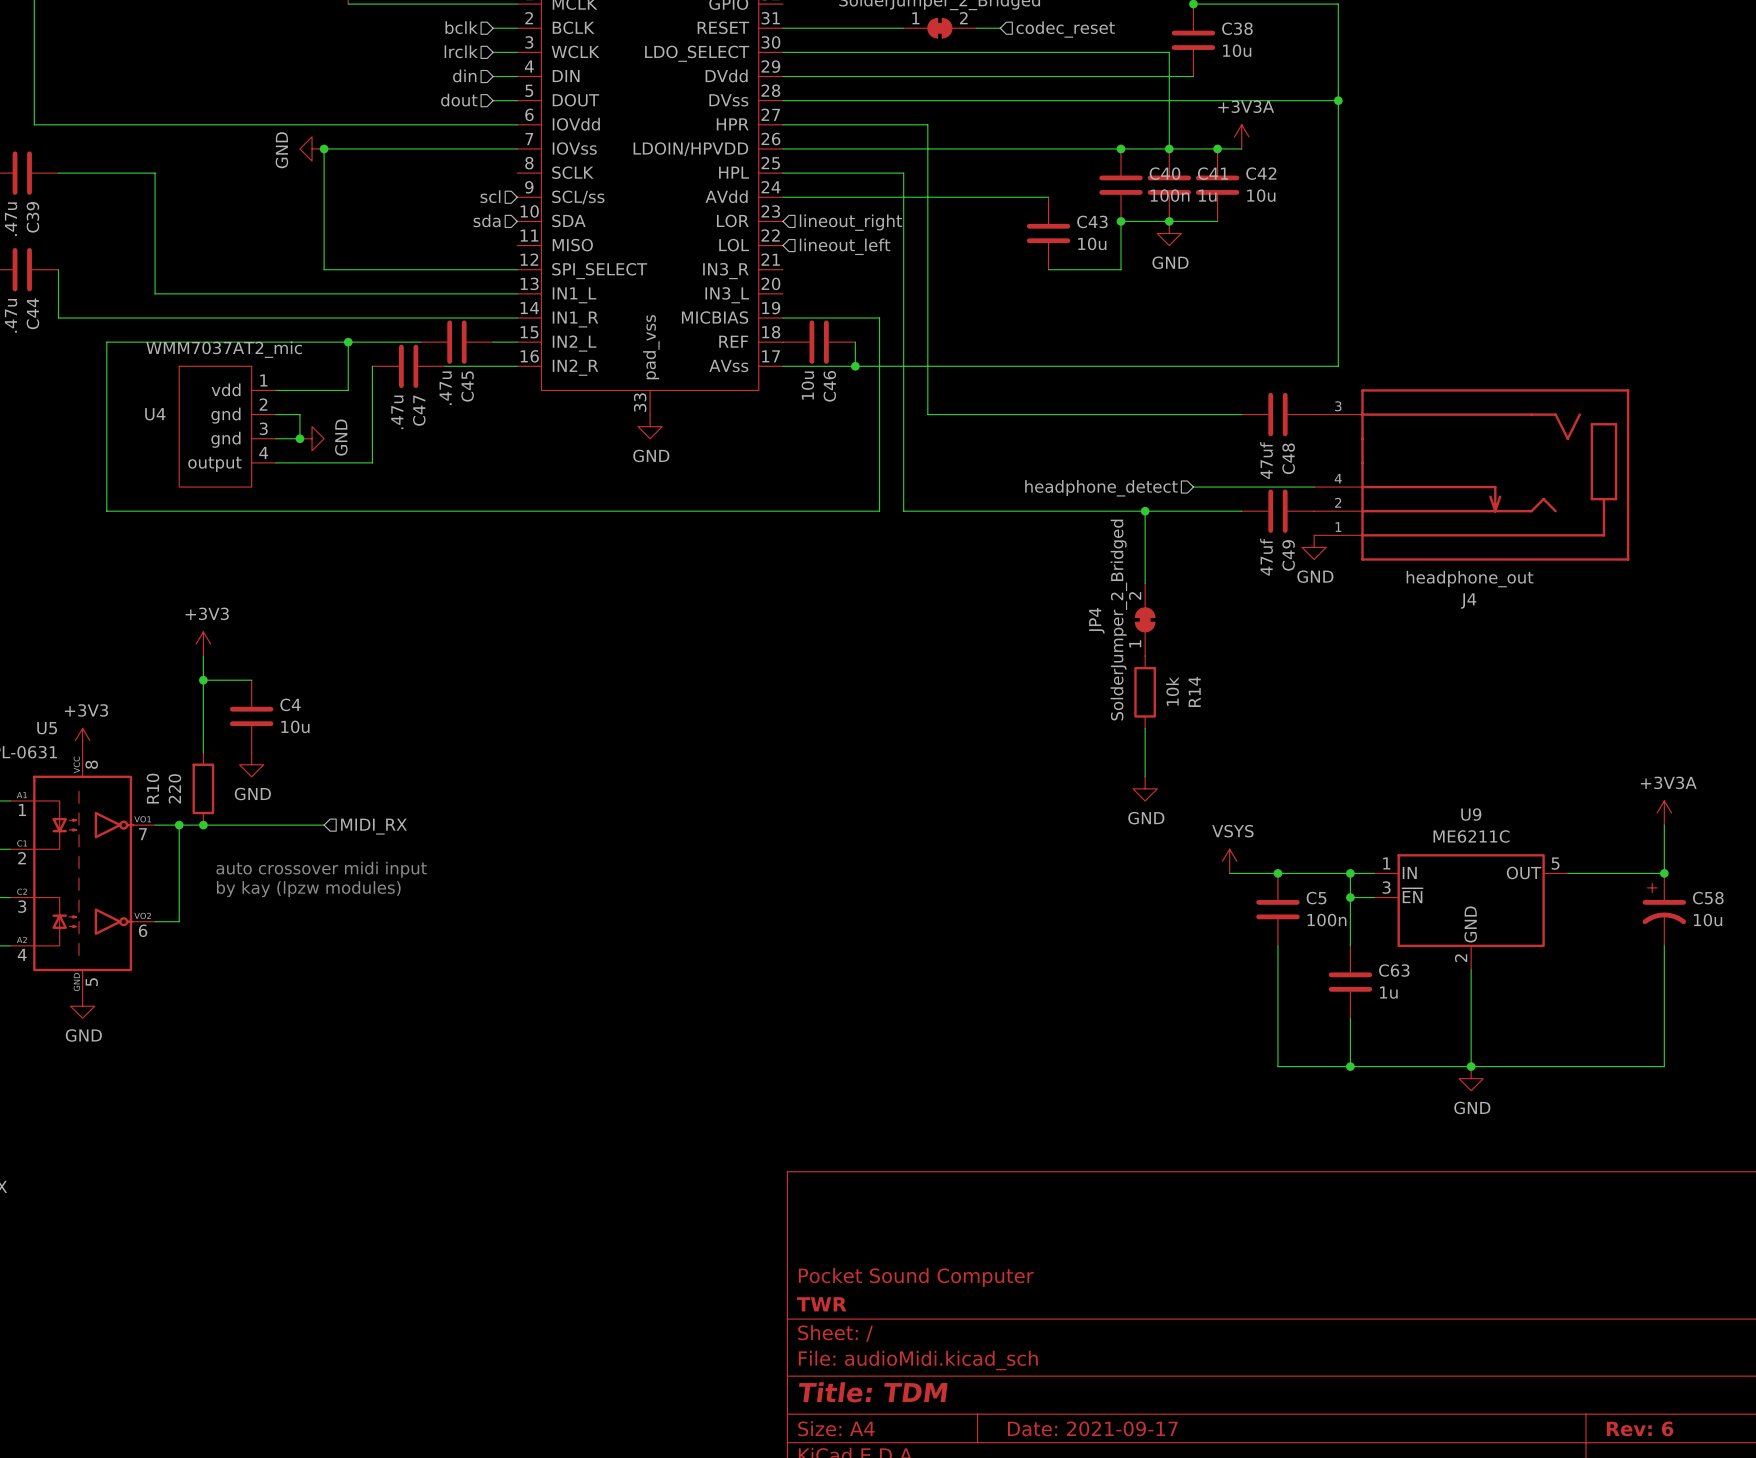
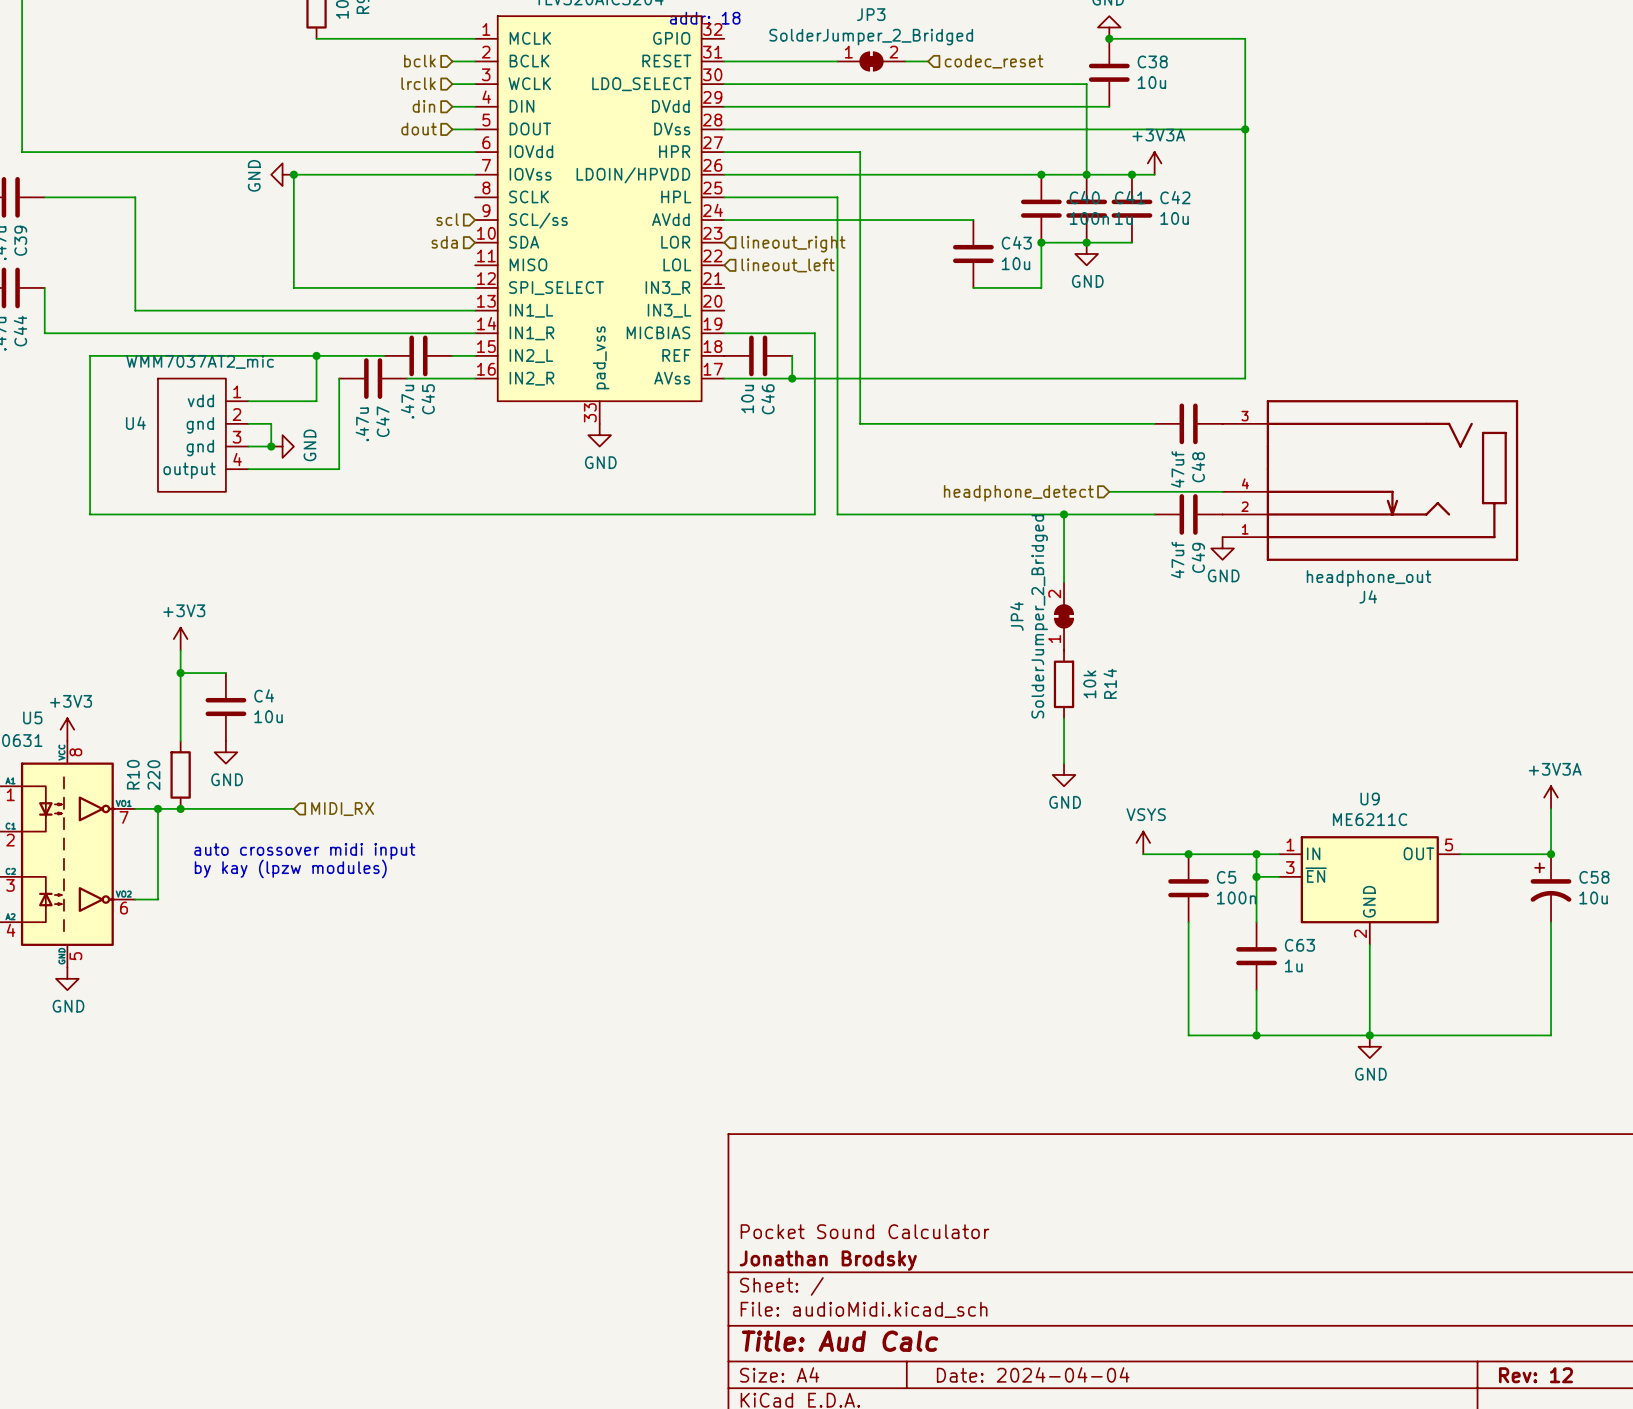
title block: Pocket Sound Computer (916, 1277) -> Pocket Sound Calculator (865, 1231)
title block: TWR (821, 1304) -> Jonathan Brodsky (828, 1260)
title block: Title: TDM (873, 1392) -> Title: Aud Calc (840, 1341)
title block: Date: 2021-09-17 (1092, 1428) -> Date: 2024-04-04 (1033, 1374)
title block: Rev: 6 (1640, 1428) -> Rev: 12 (1535, 1375)

